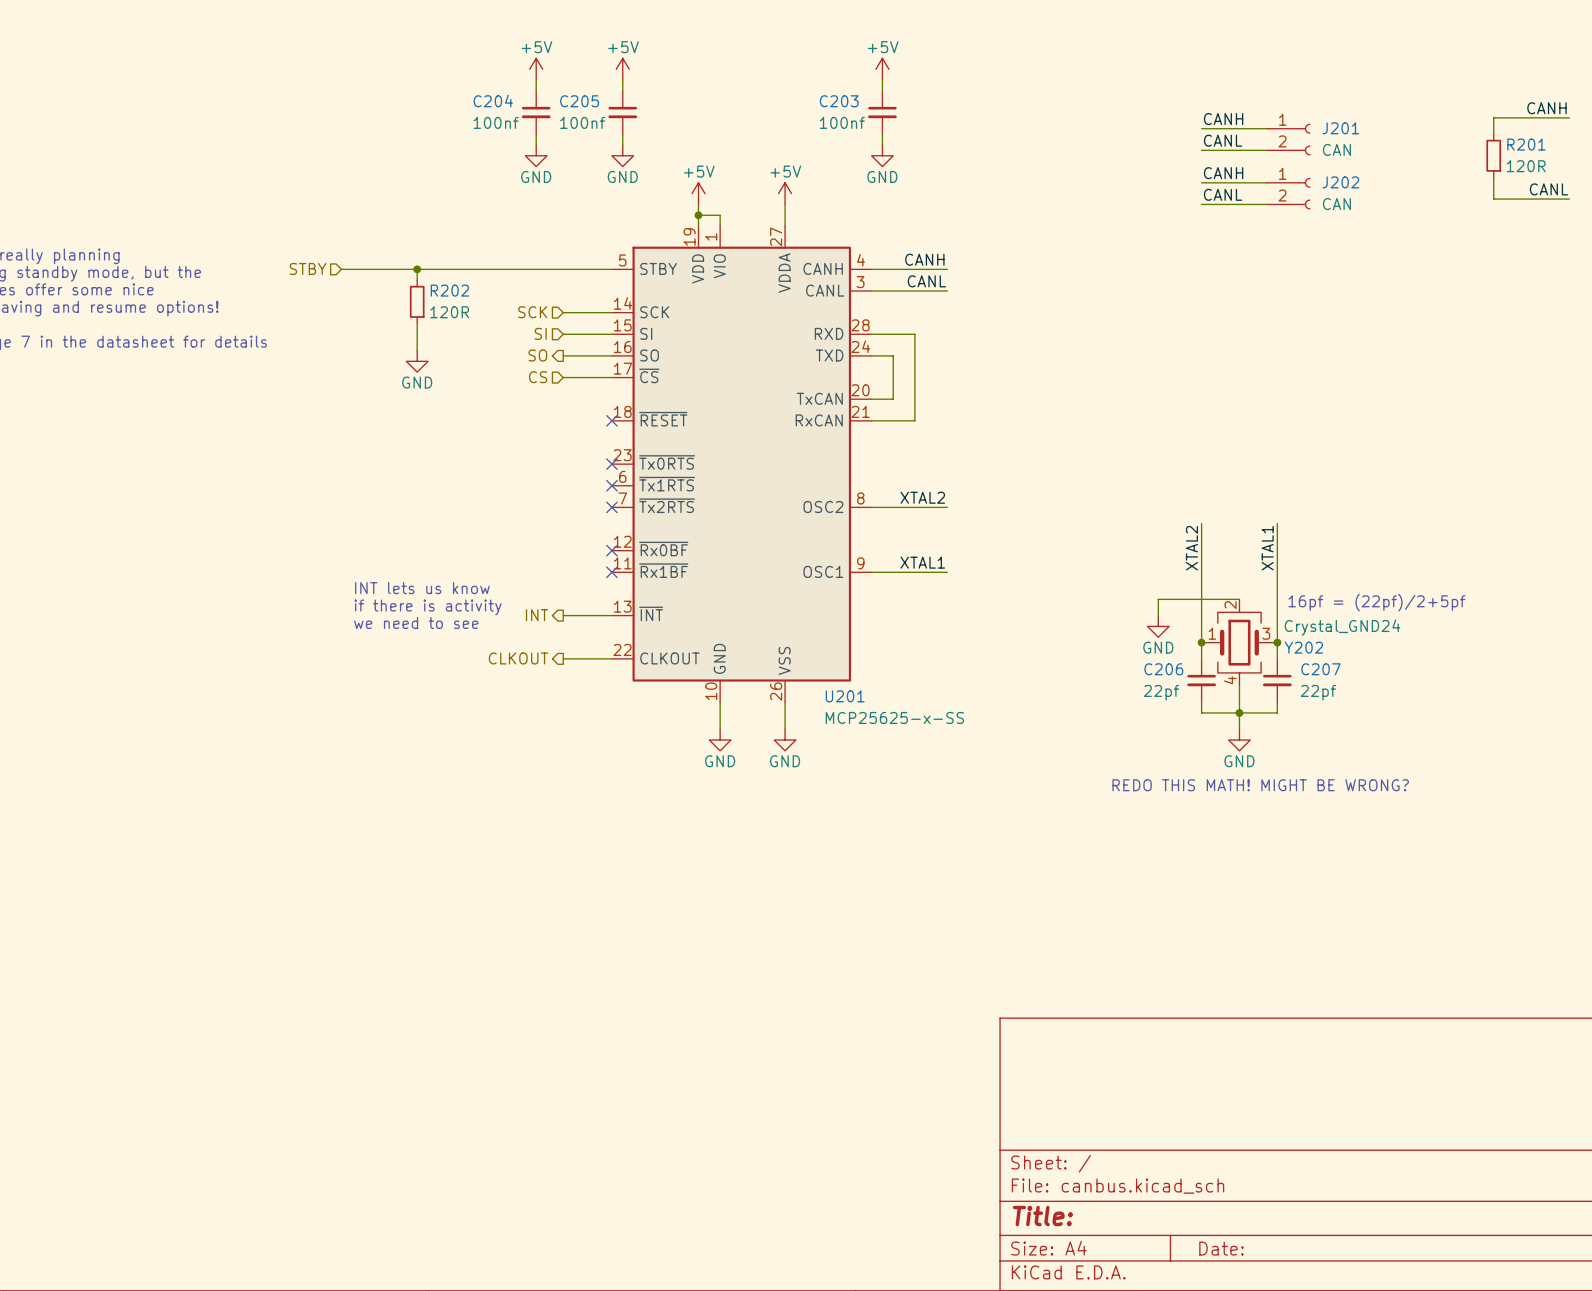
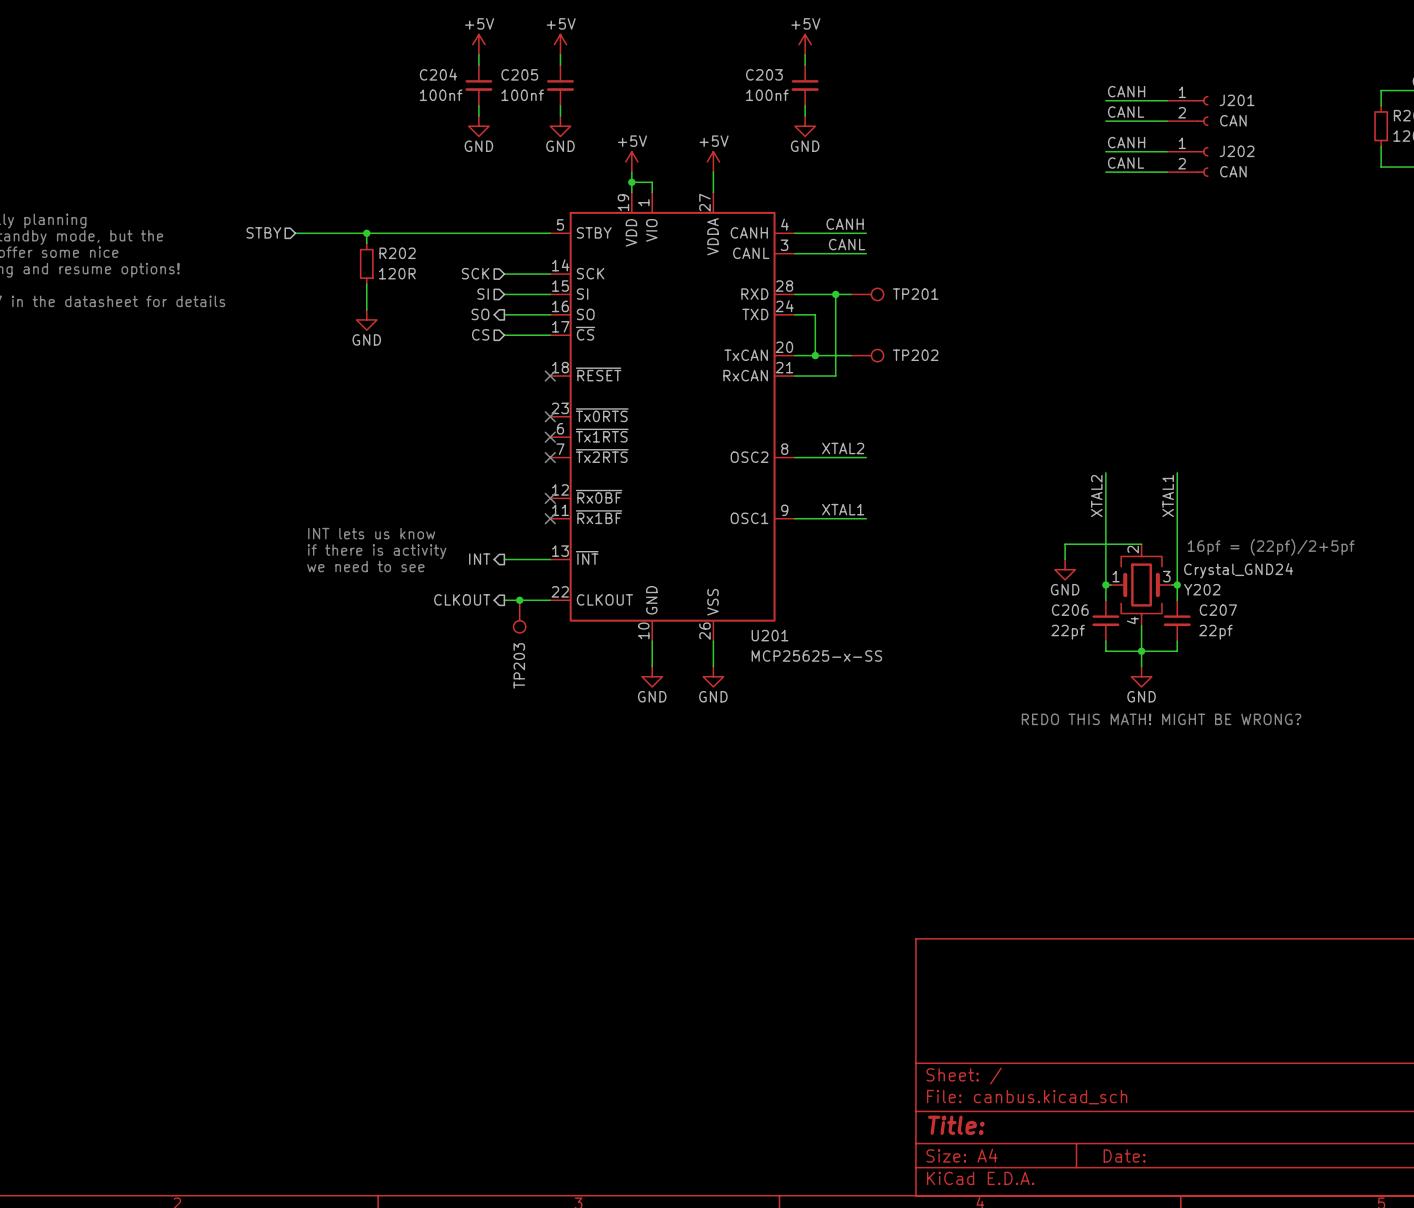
wire: none -> (835, 294) (851, 294)
junction: none -> (835, 294)
TP201: none -> (867, 294)
wire: none -> (815, 355) (851, 355)
junction: none -> (815, 355)
TP202: none -> (867, 355)
junction: none -> (519, 600)
TP203: none -> (519, 616)

